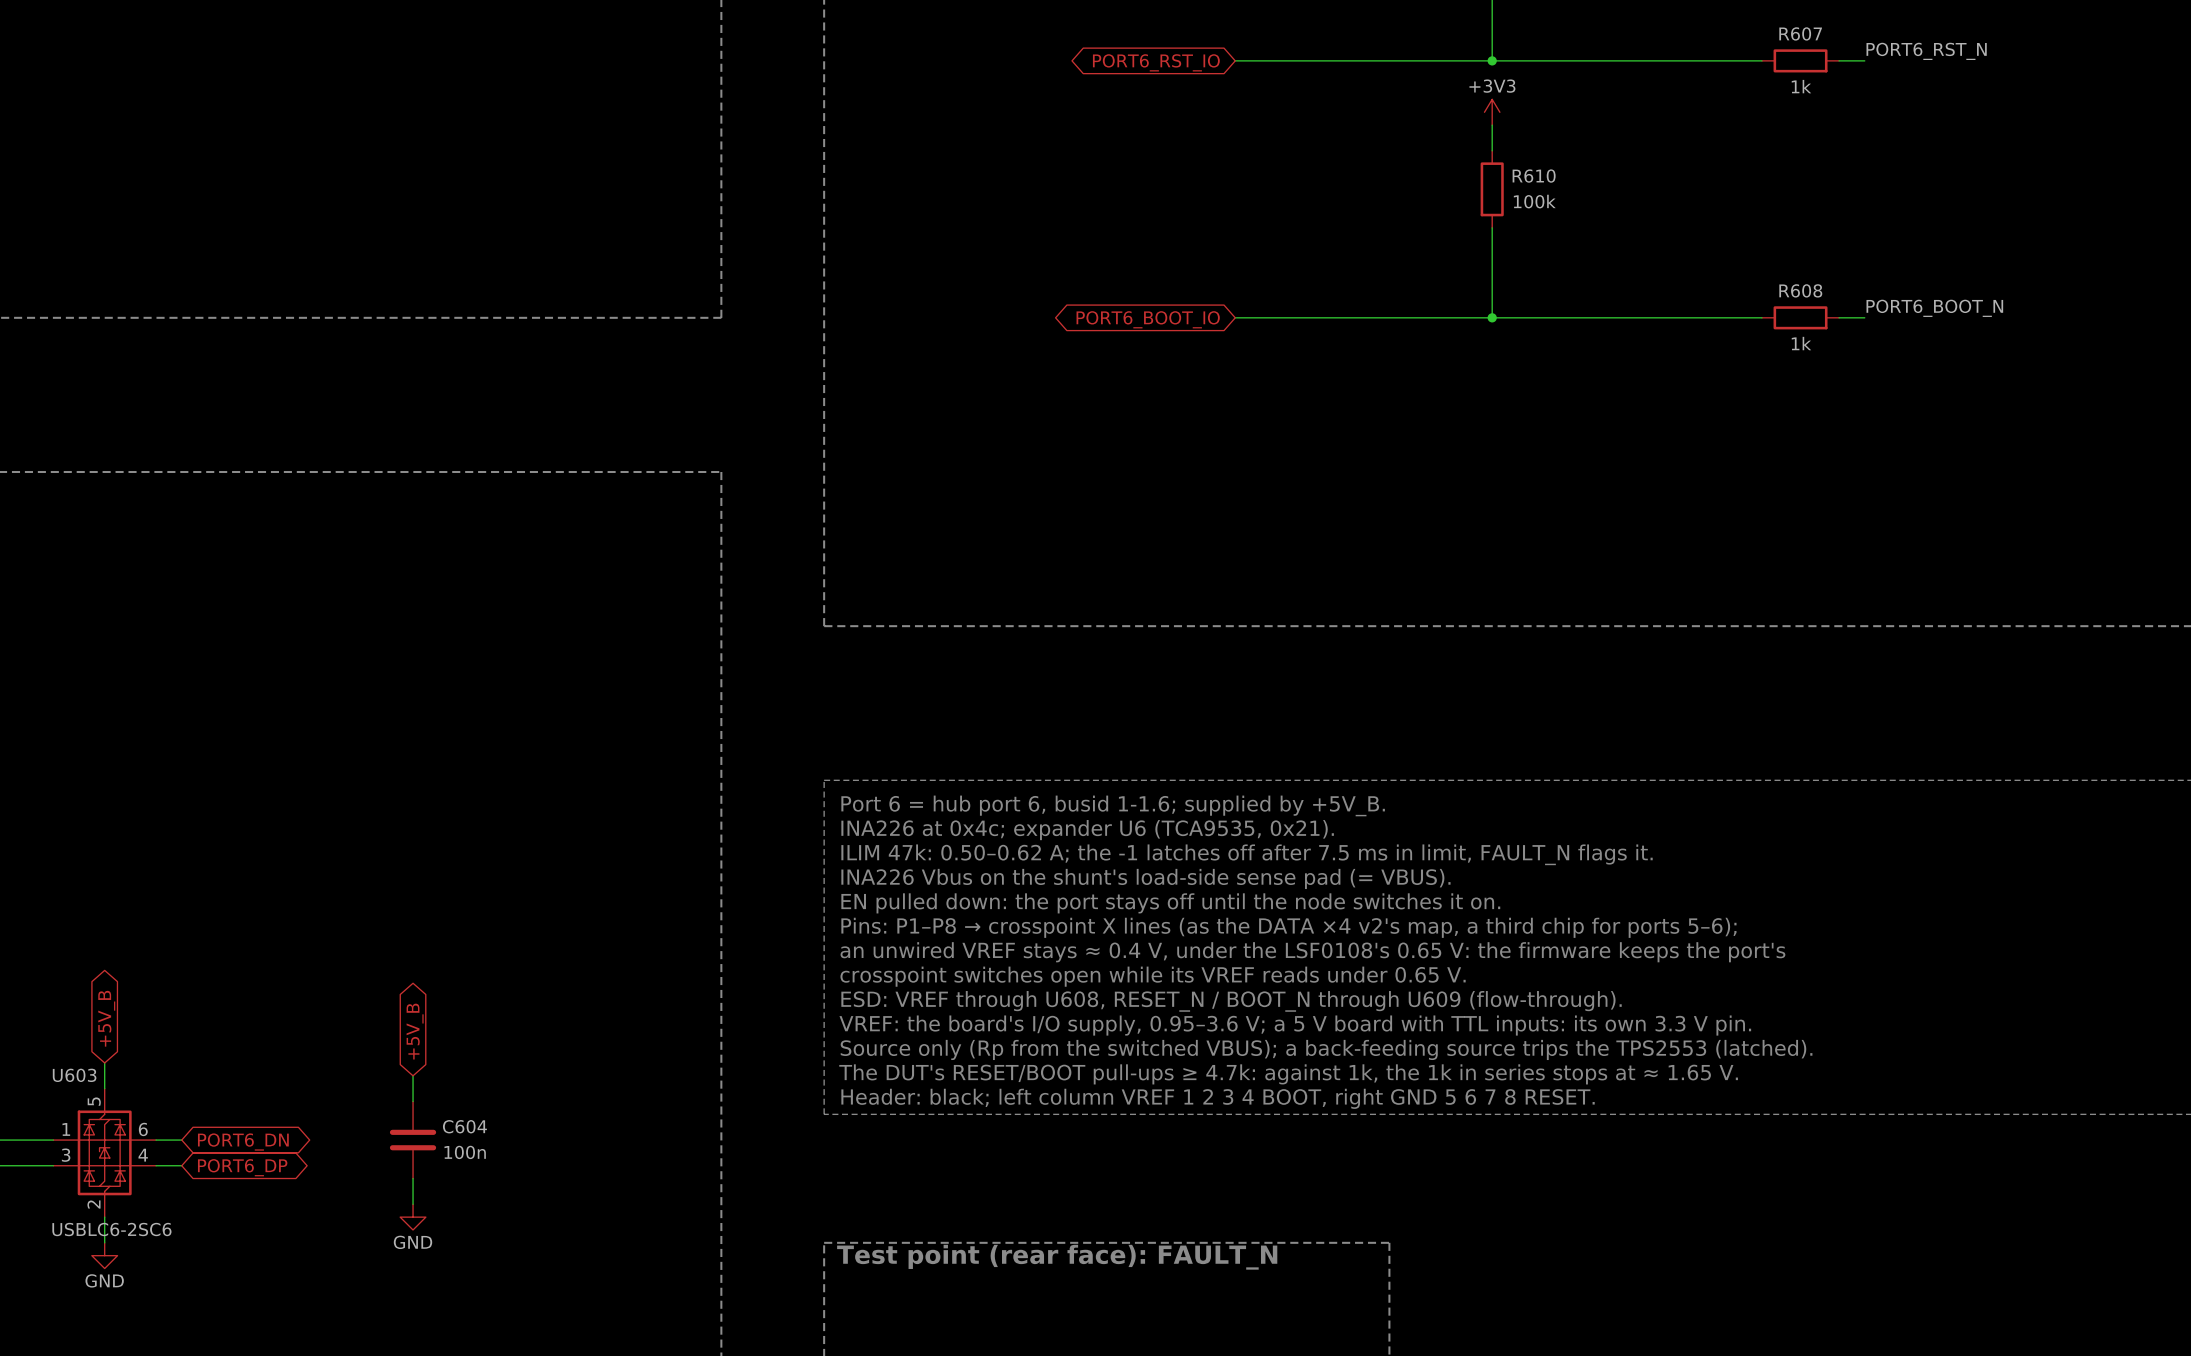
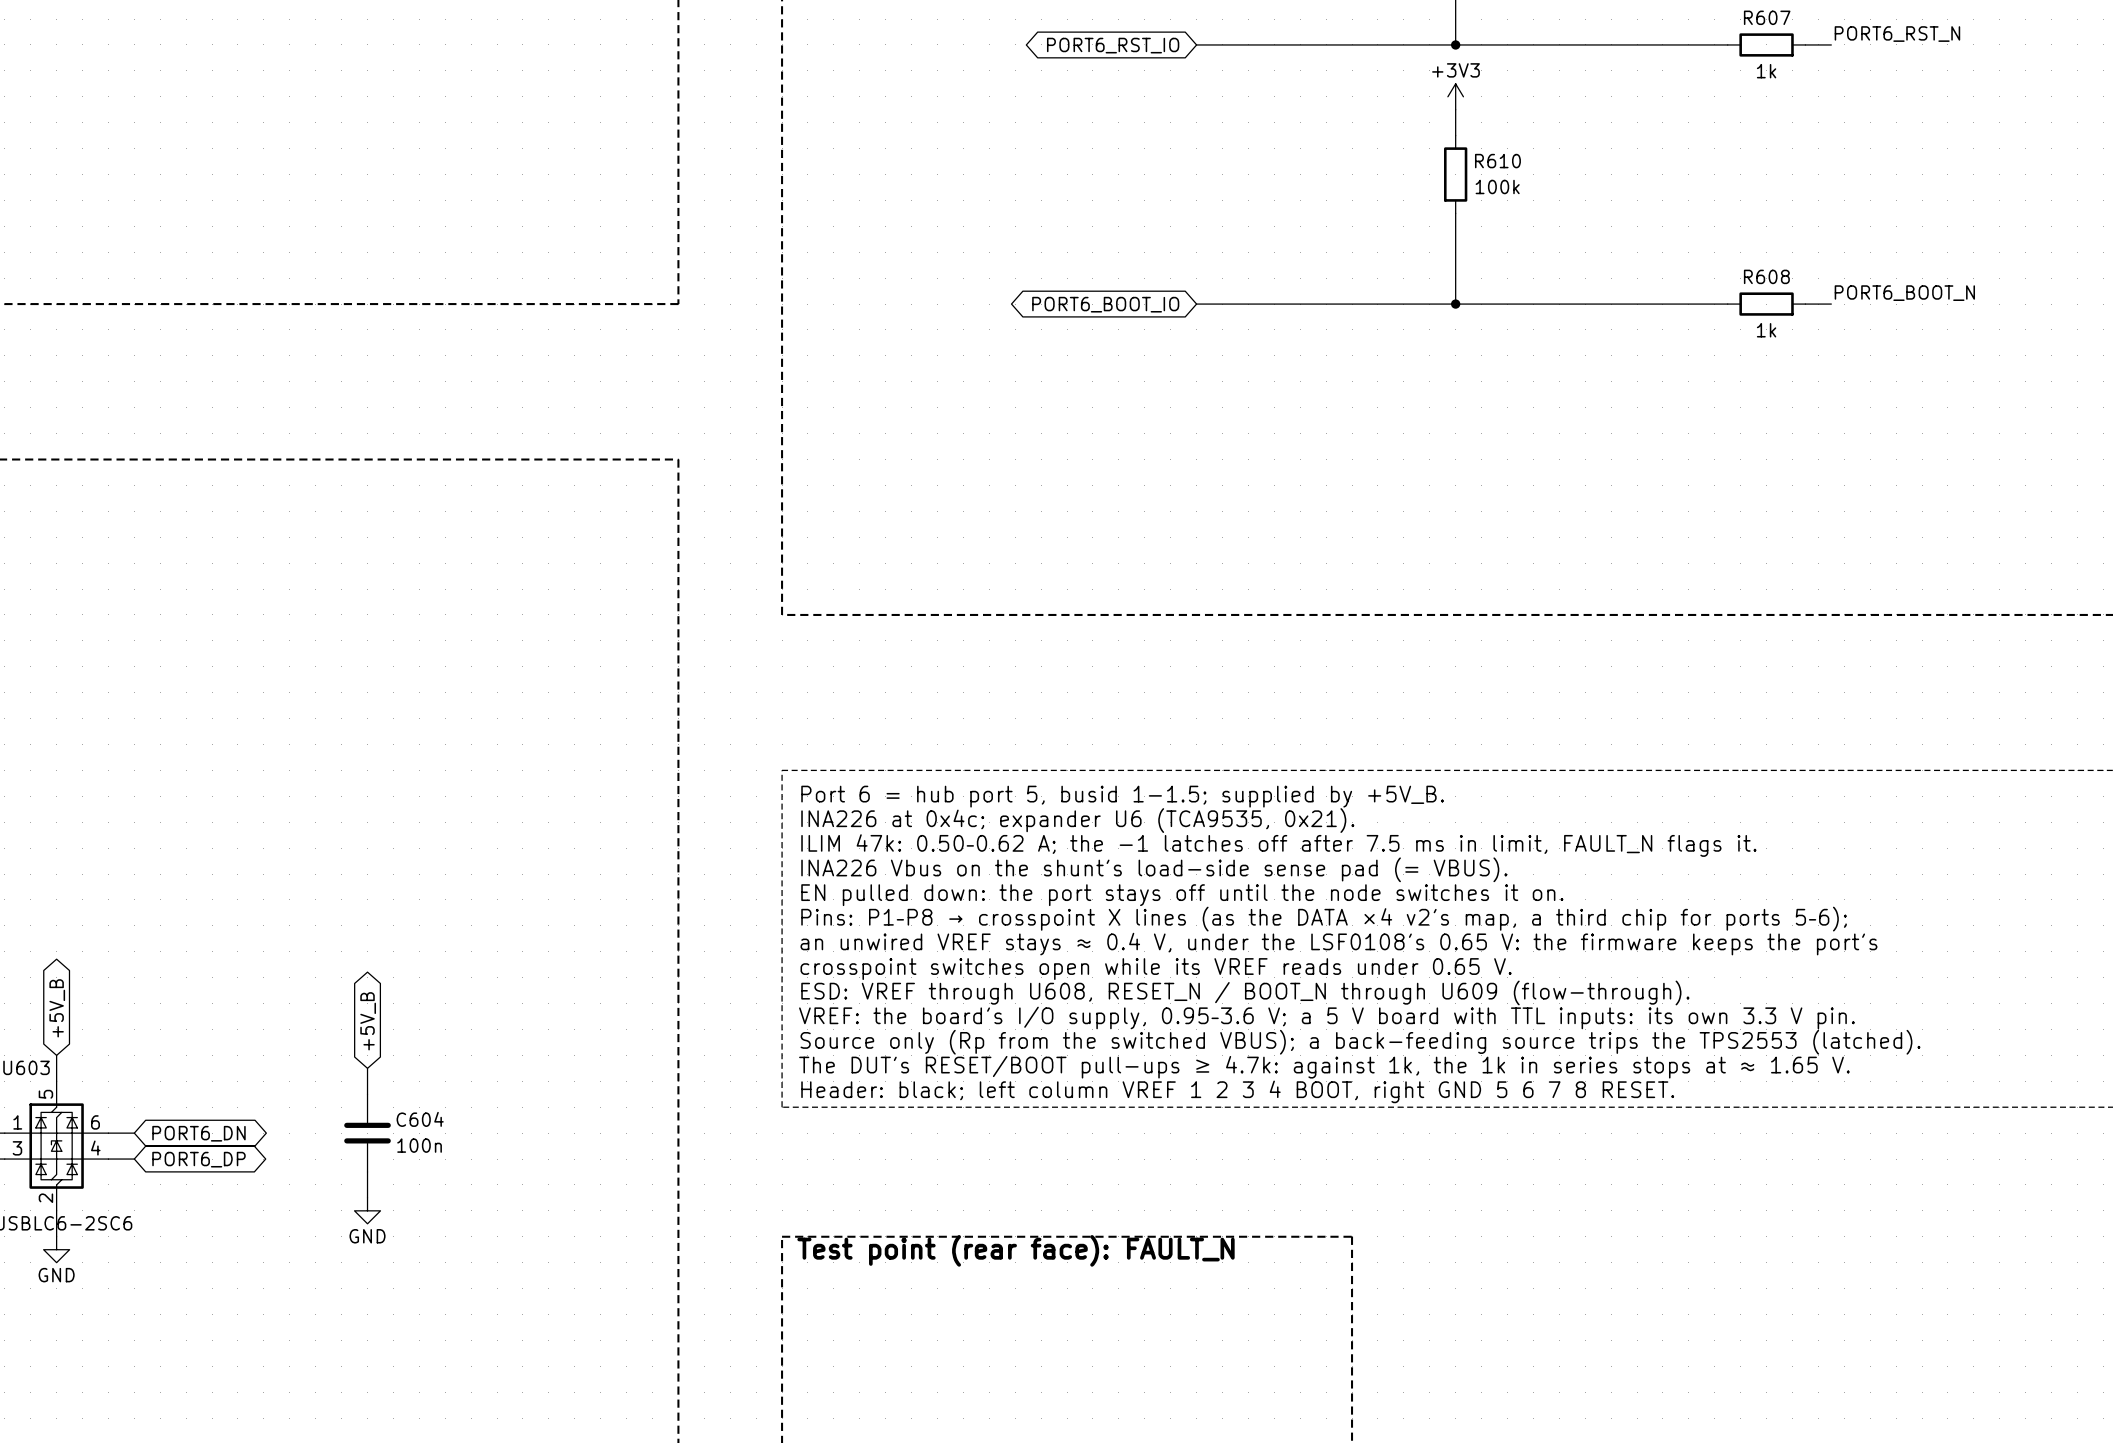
text: Port 6 = hub port 6, busid 1-1.6; supplied by +5V_B. (1113, 805) -> Port 6 = hub port 5, busid 1-1.5; supplied by +5V_B. (1122, 796)

